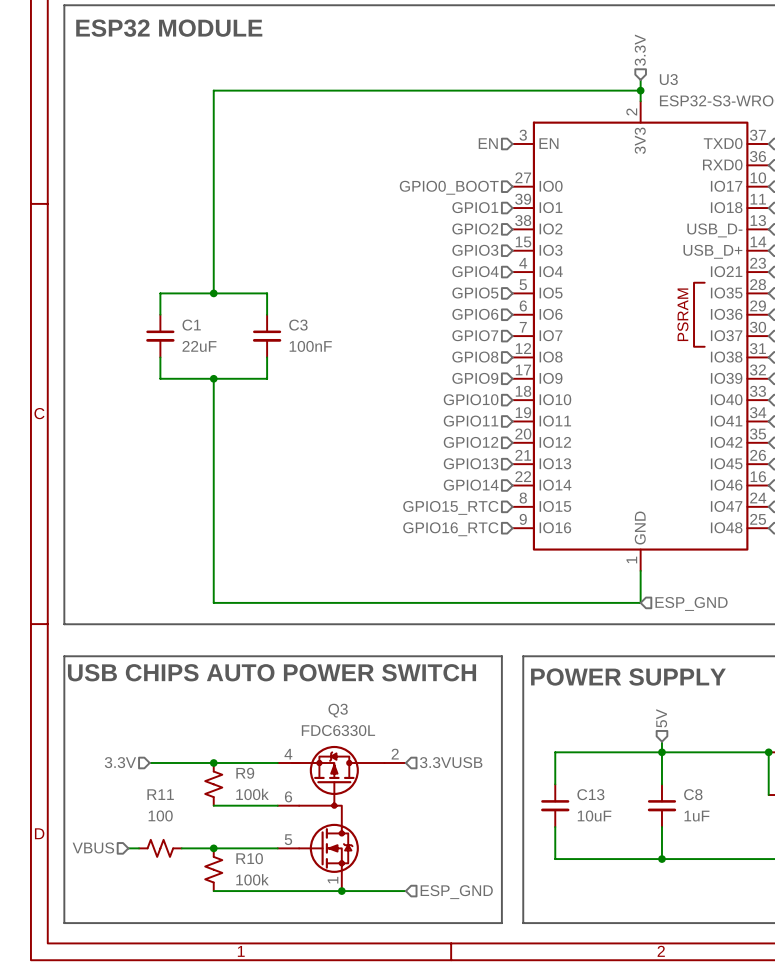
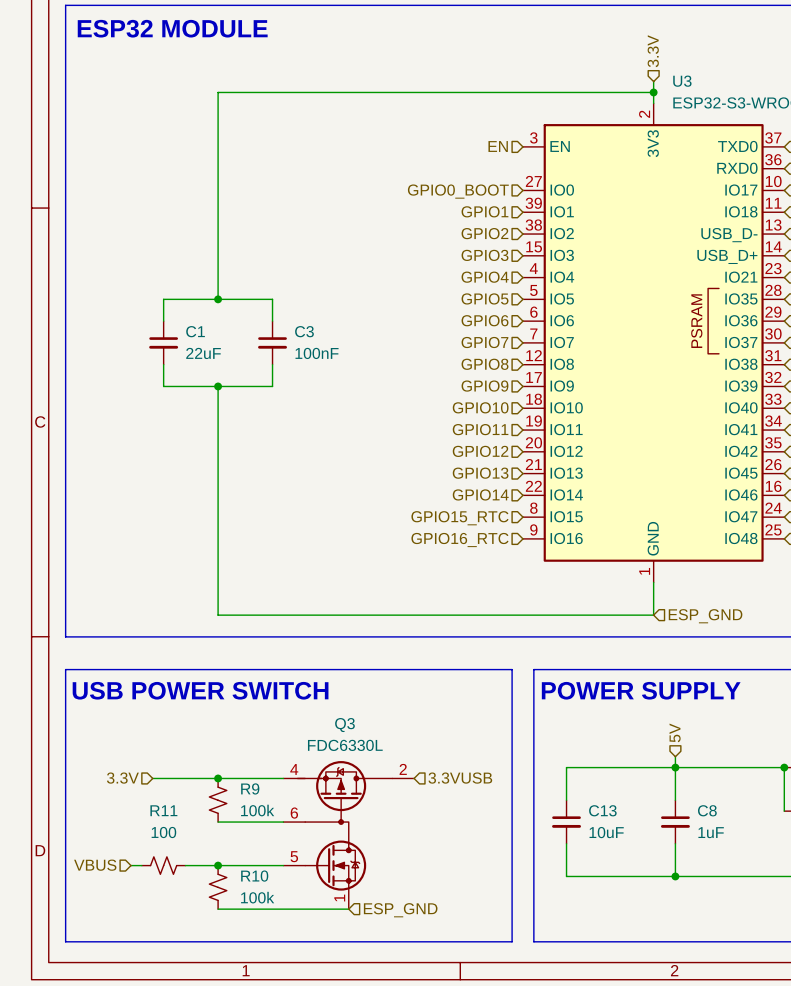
text: USB CHIPS AUTO POWER SWITCH (272, 672) -> USB POWER SWITCH (200, 690)
wire: (341, 891) (405, 891) -> none
junction: (341, 891) -> none
hierarchical label position: ESP_GND (456, 892) -> ESP_GND (400, 910)

